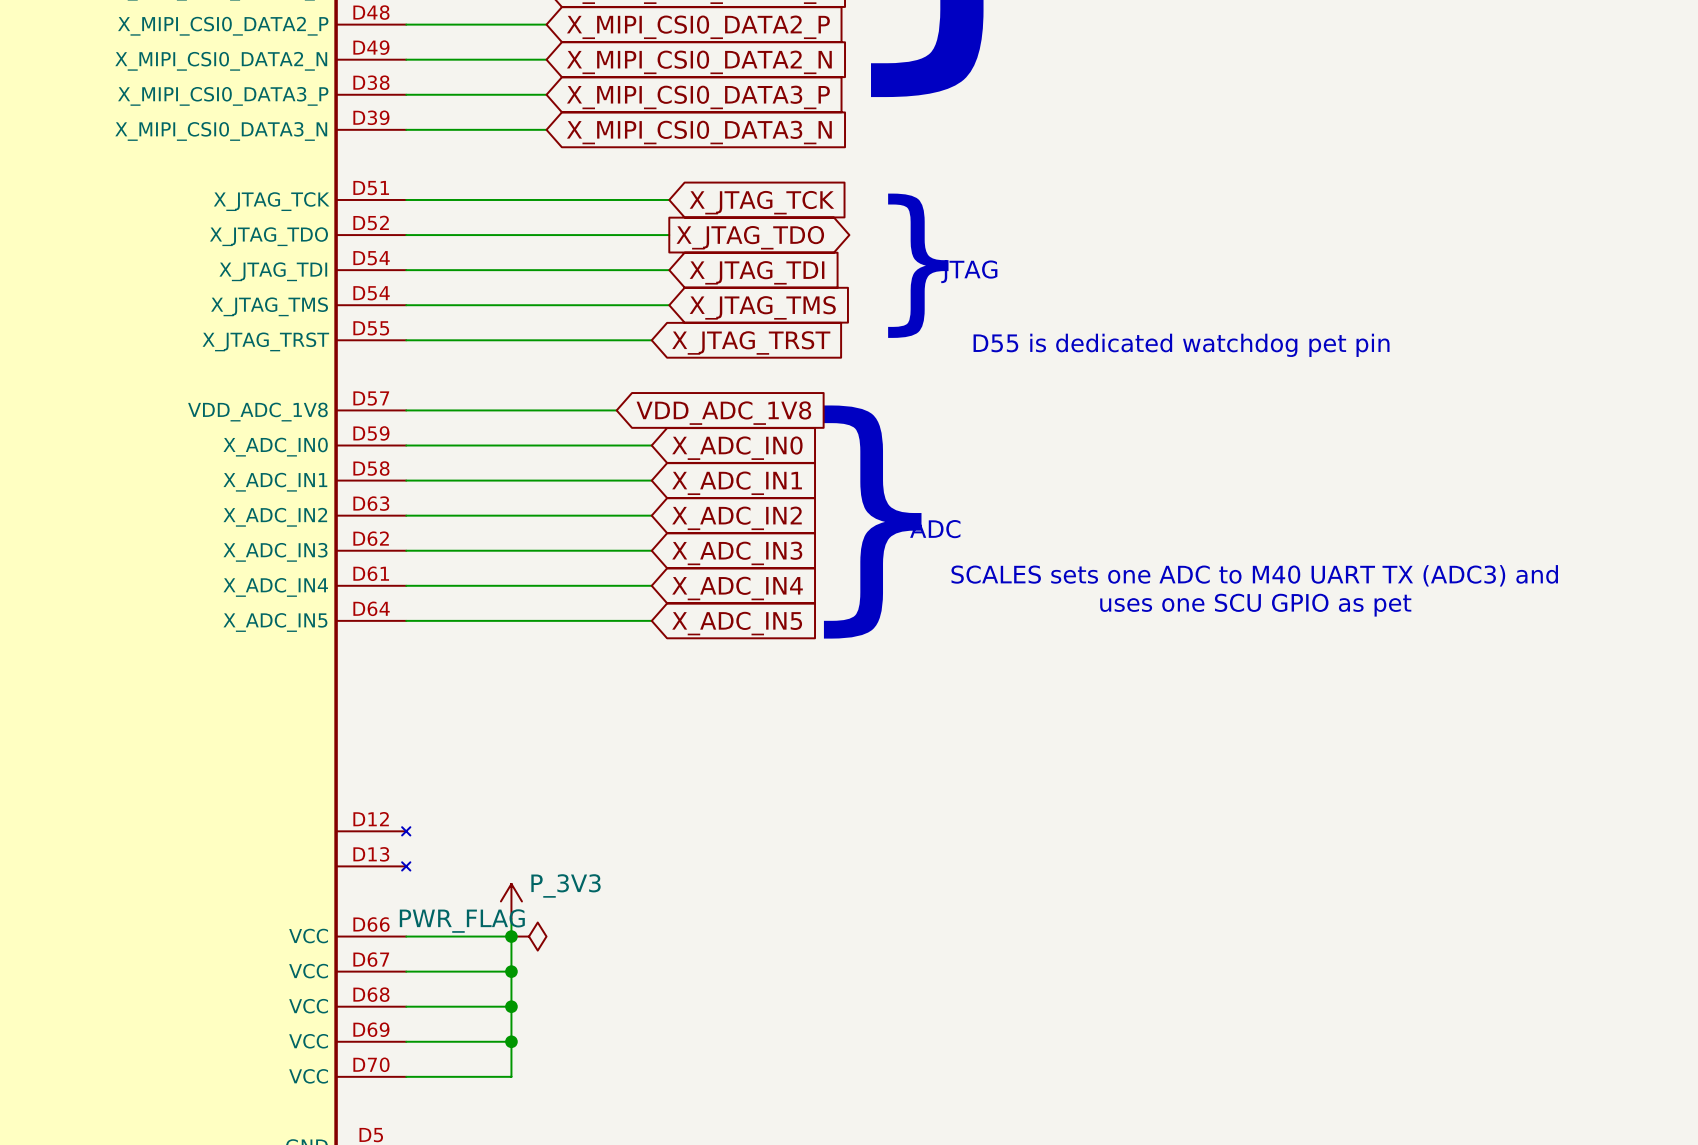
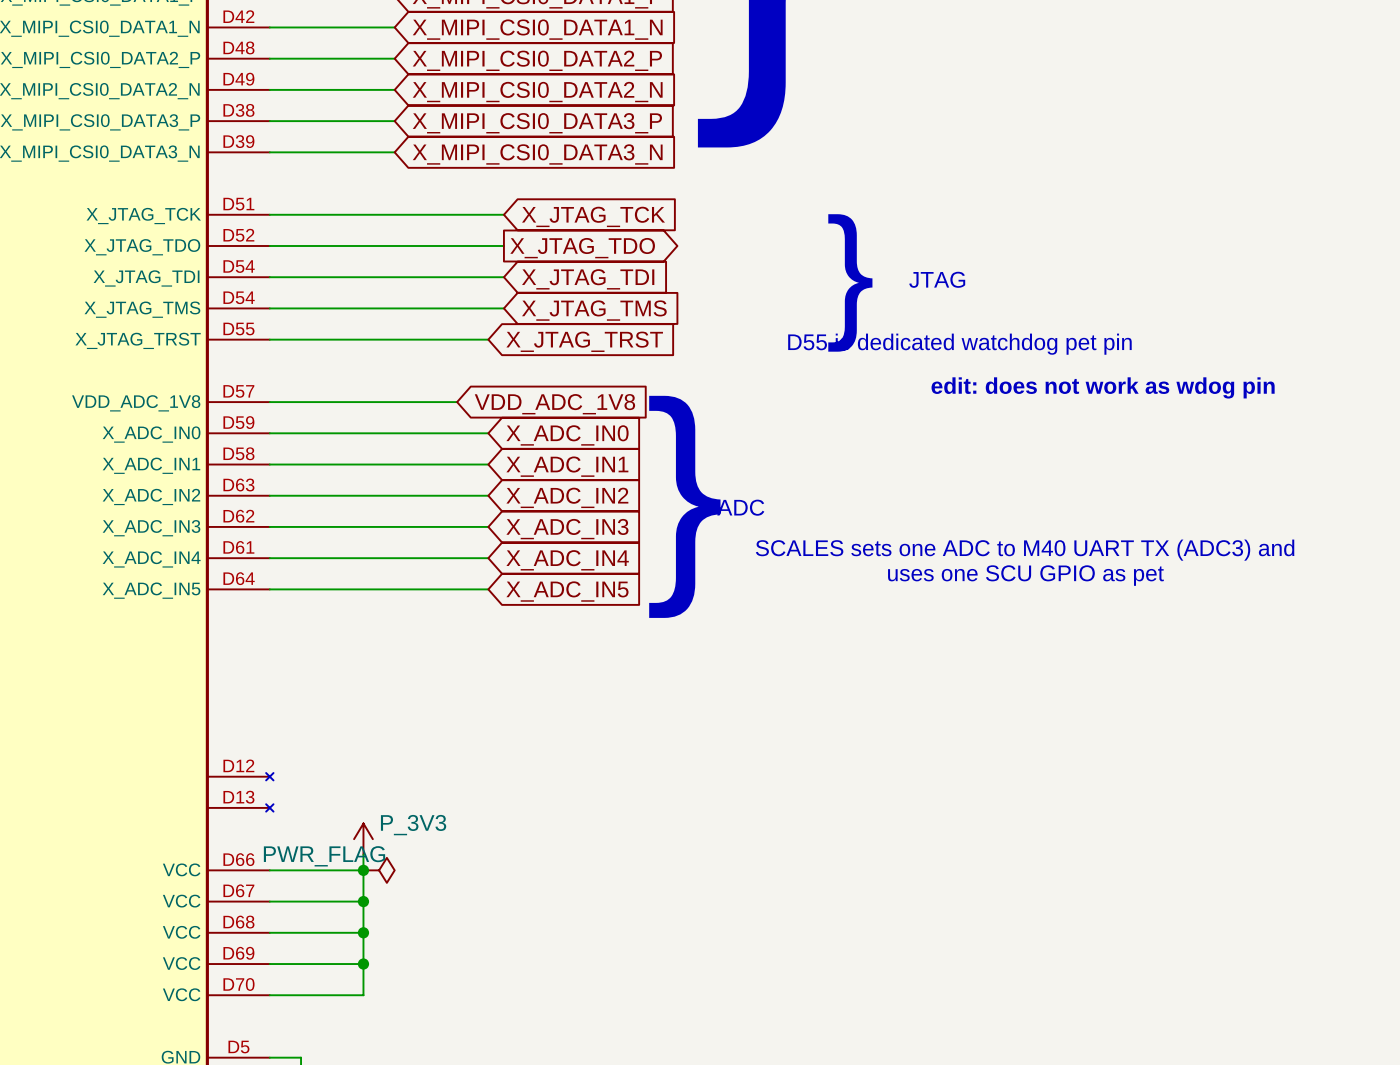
text position: } (918, 265) -> } (850, 282)
text position: JTAG (969, 271) -> JTAG (937, 279)
text: none -> edit: does not work as wdog pin (1103, 387)

